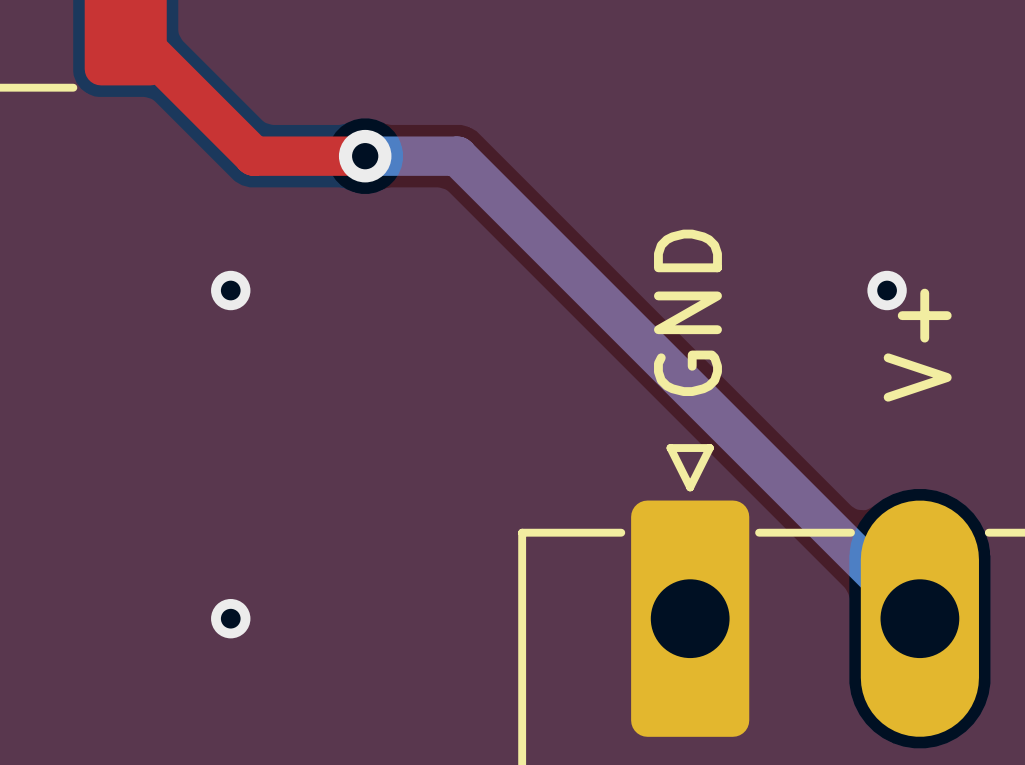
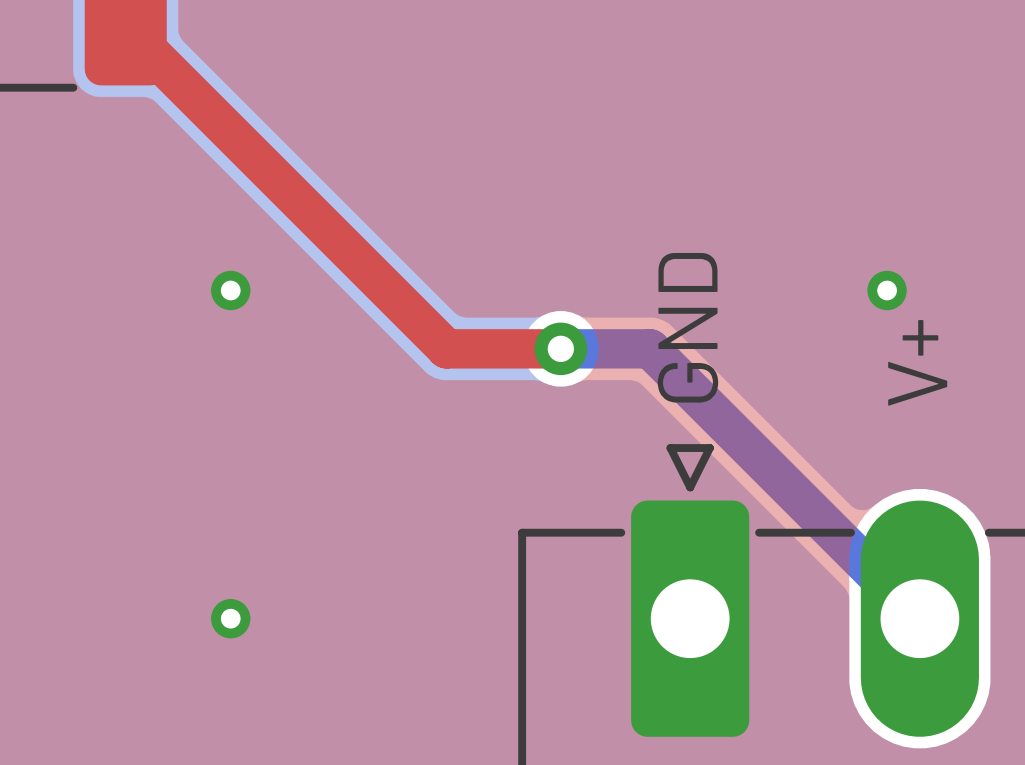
top track: (253, 156) (365, 156) -> (253, 156) (446, 348) (560, 348)
bottom track: (365, 156) (457, 156) (650, 348) -> (560, 348) (650, 348)
via position: (365, 156) -> (560, 348)

